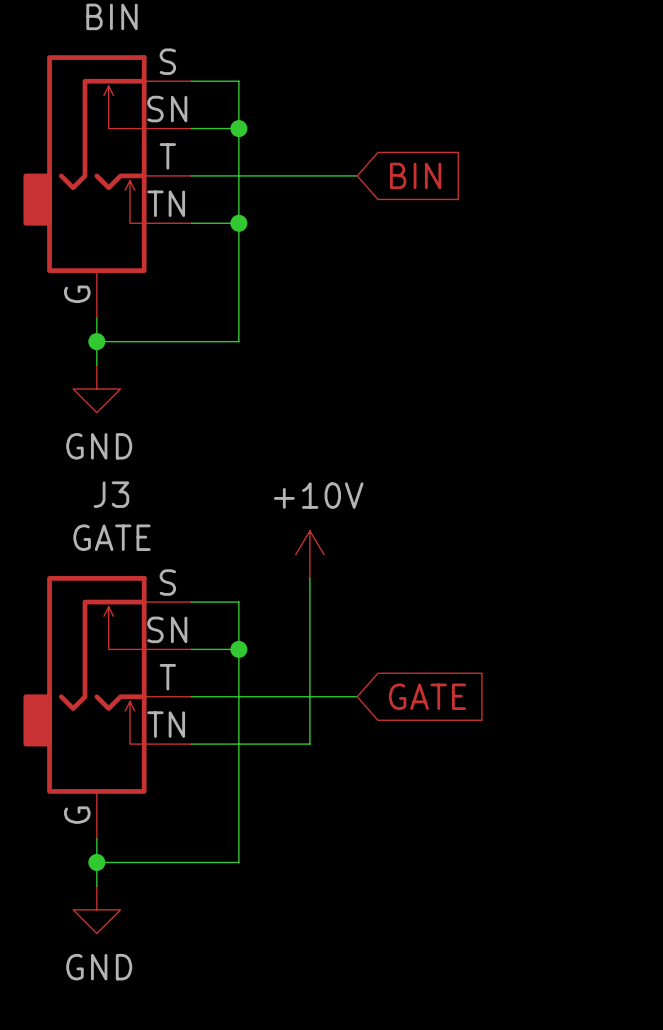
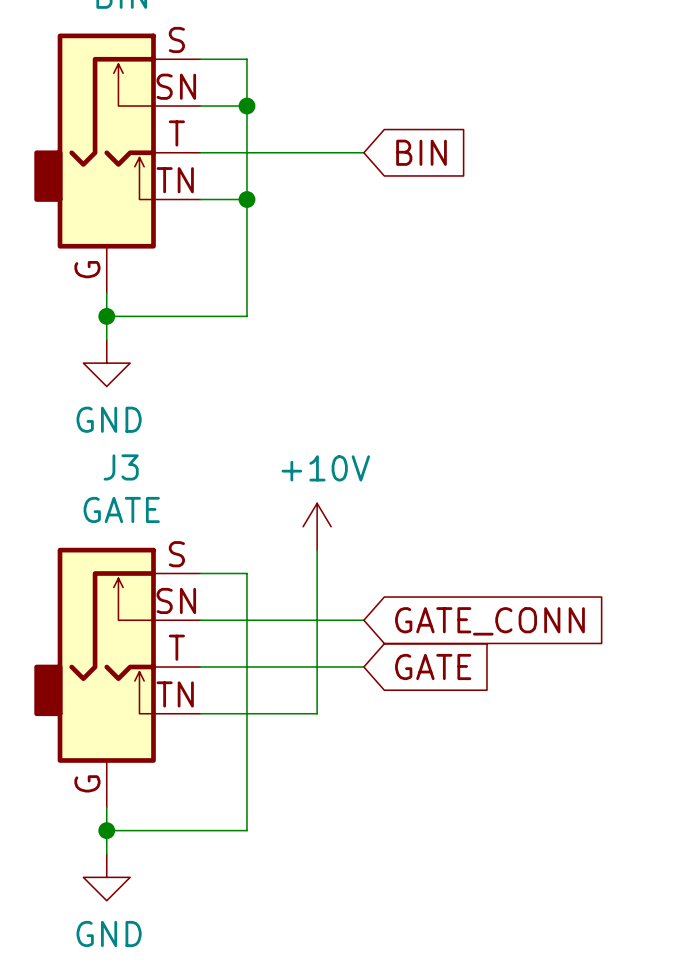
wire: none -> (246, 620) (363, 620)
junction: (238, 649) -> none
global label: none -> GATE_CONN (489, 621)

